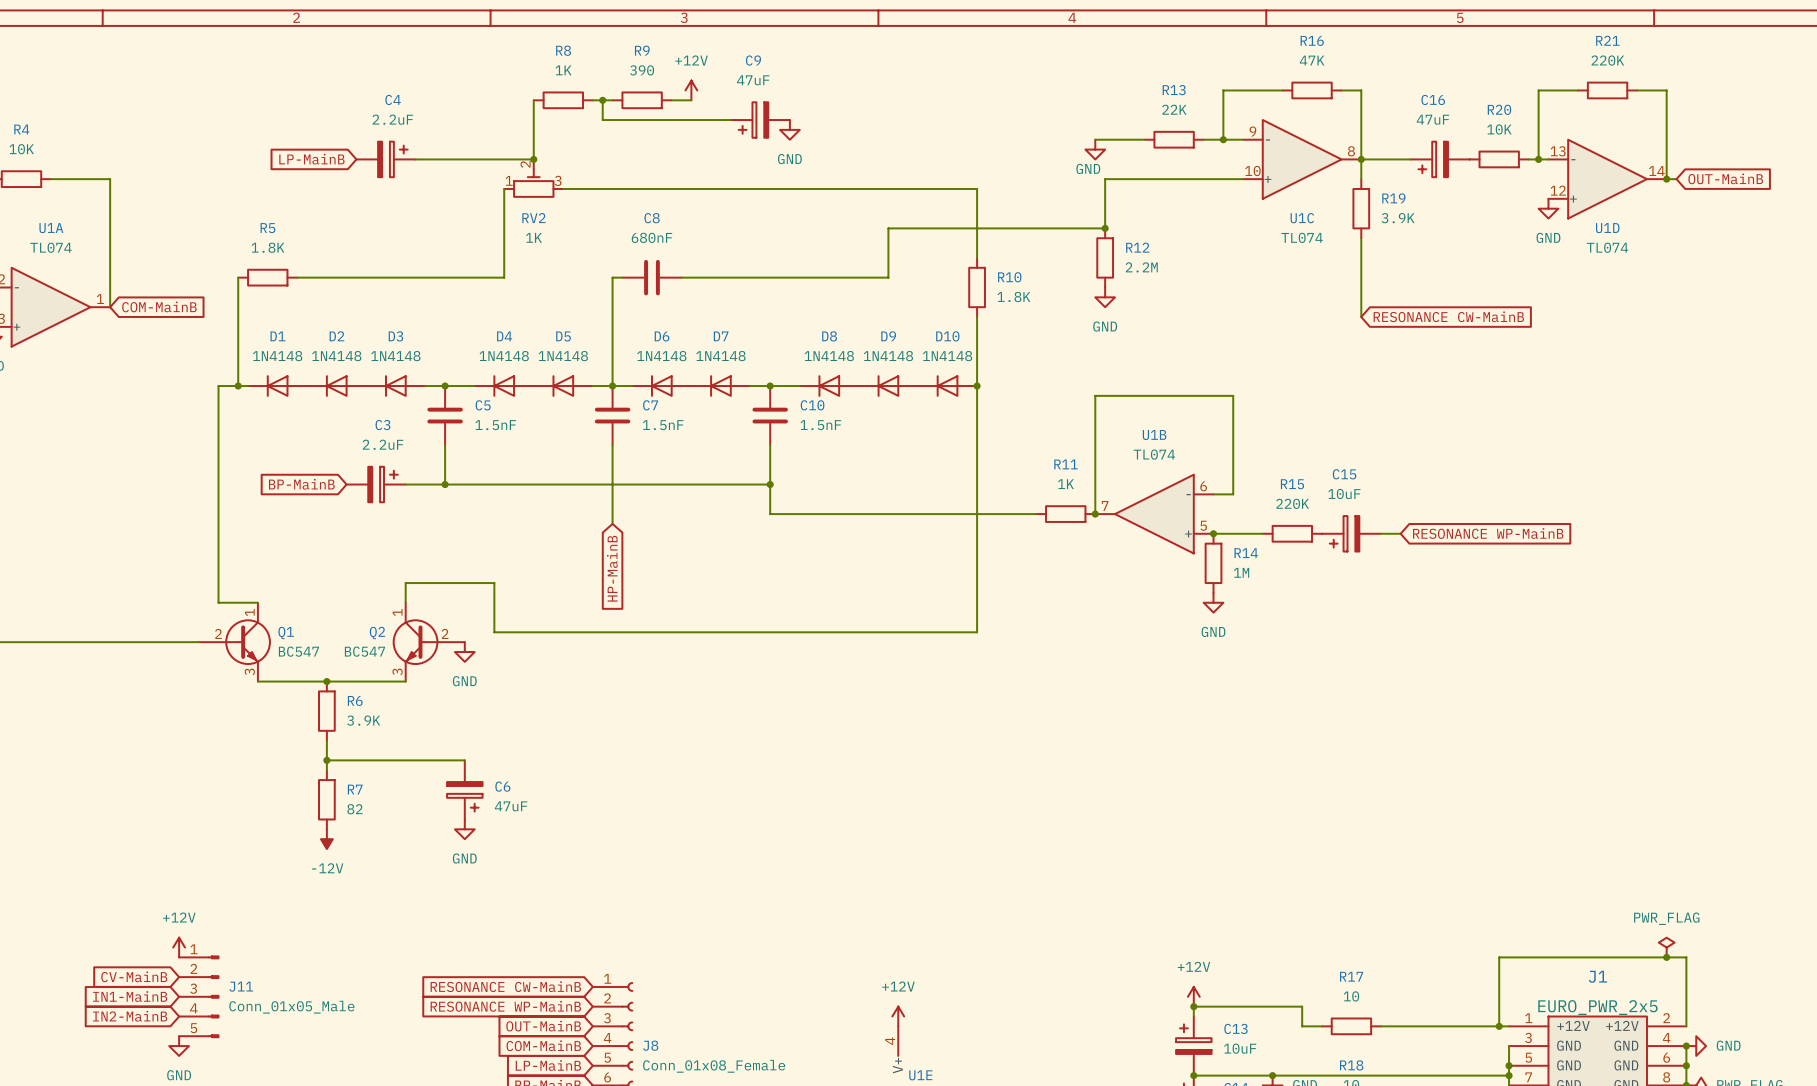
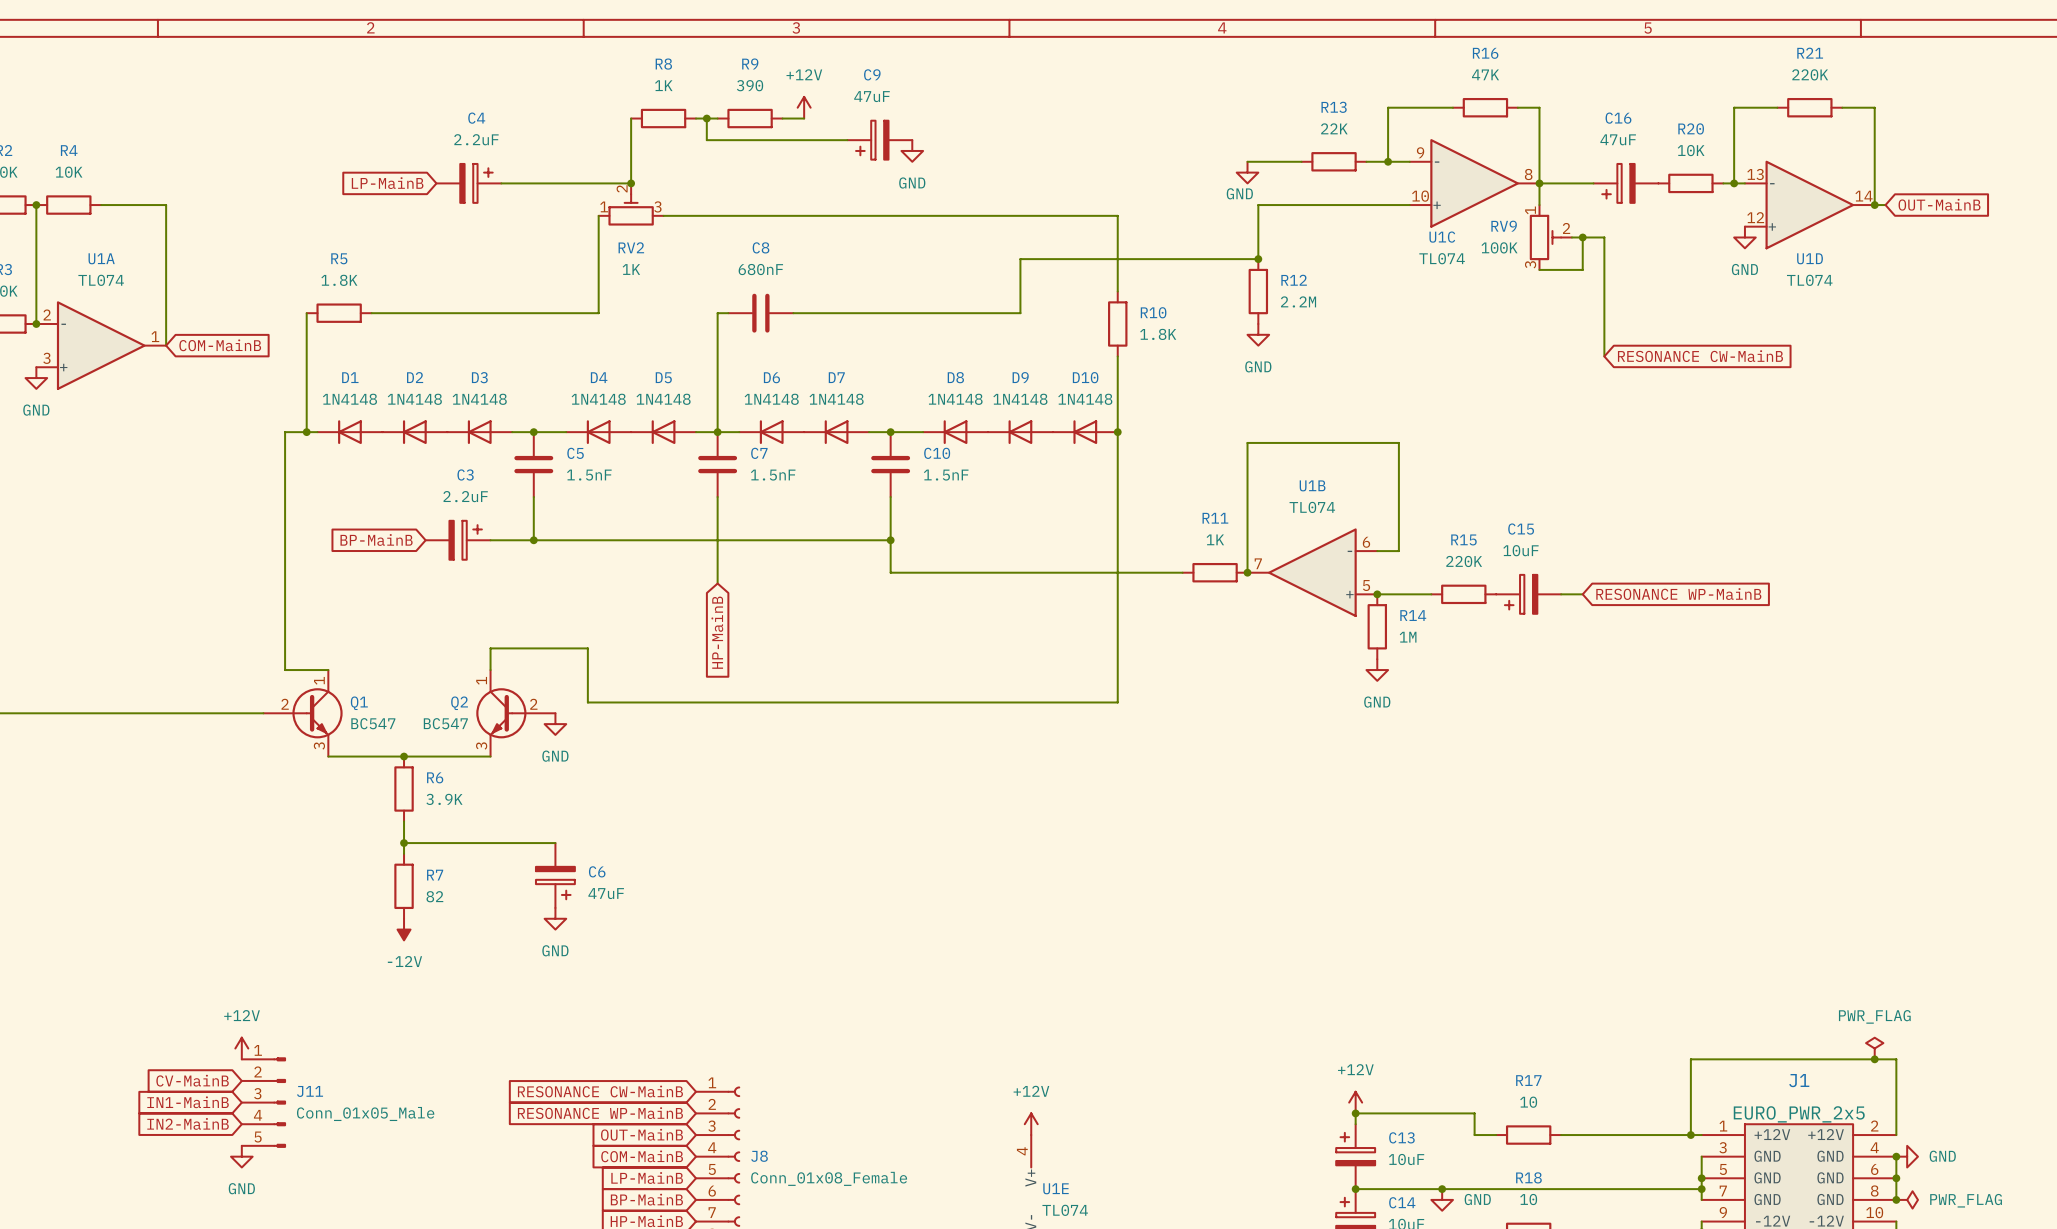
R19: 3.9K (1361, 208) -> none
RV9: none -> 100K (1550, 237)
wire: none -> (1571, 237) (1604, 237) (1604, 356)
junction: none -> (1582, 237)
U1C name position: U1C (1302, 218) -> U1C (1442, 237)
U1C value position: TL074 (1302, 237) -> TL074 (1442, 258)
wire: (1361, 238) (1361, 317) -> (1539, 269) (1582, 269) (1582, 237)
global label position: RESONANCE CW-MainB (1448, 316) -> RESONANCE CW-MainB (1700, 356)

